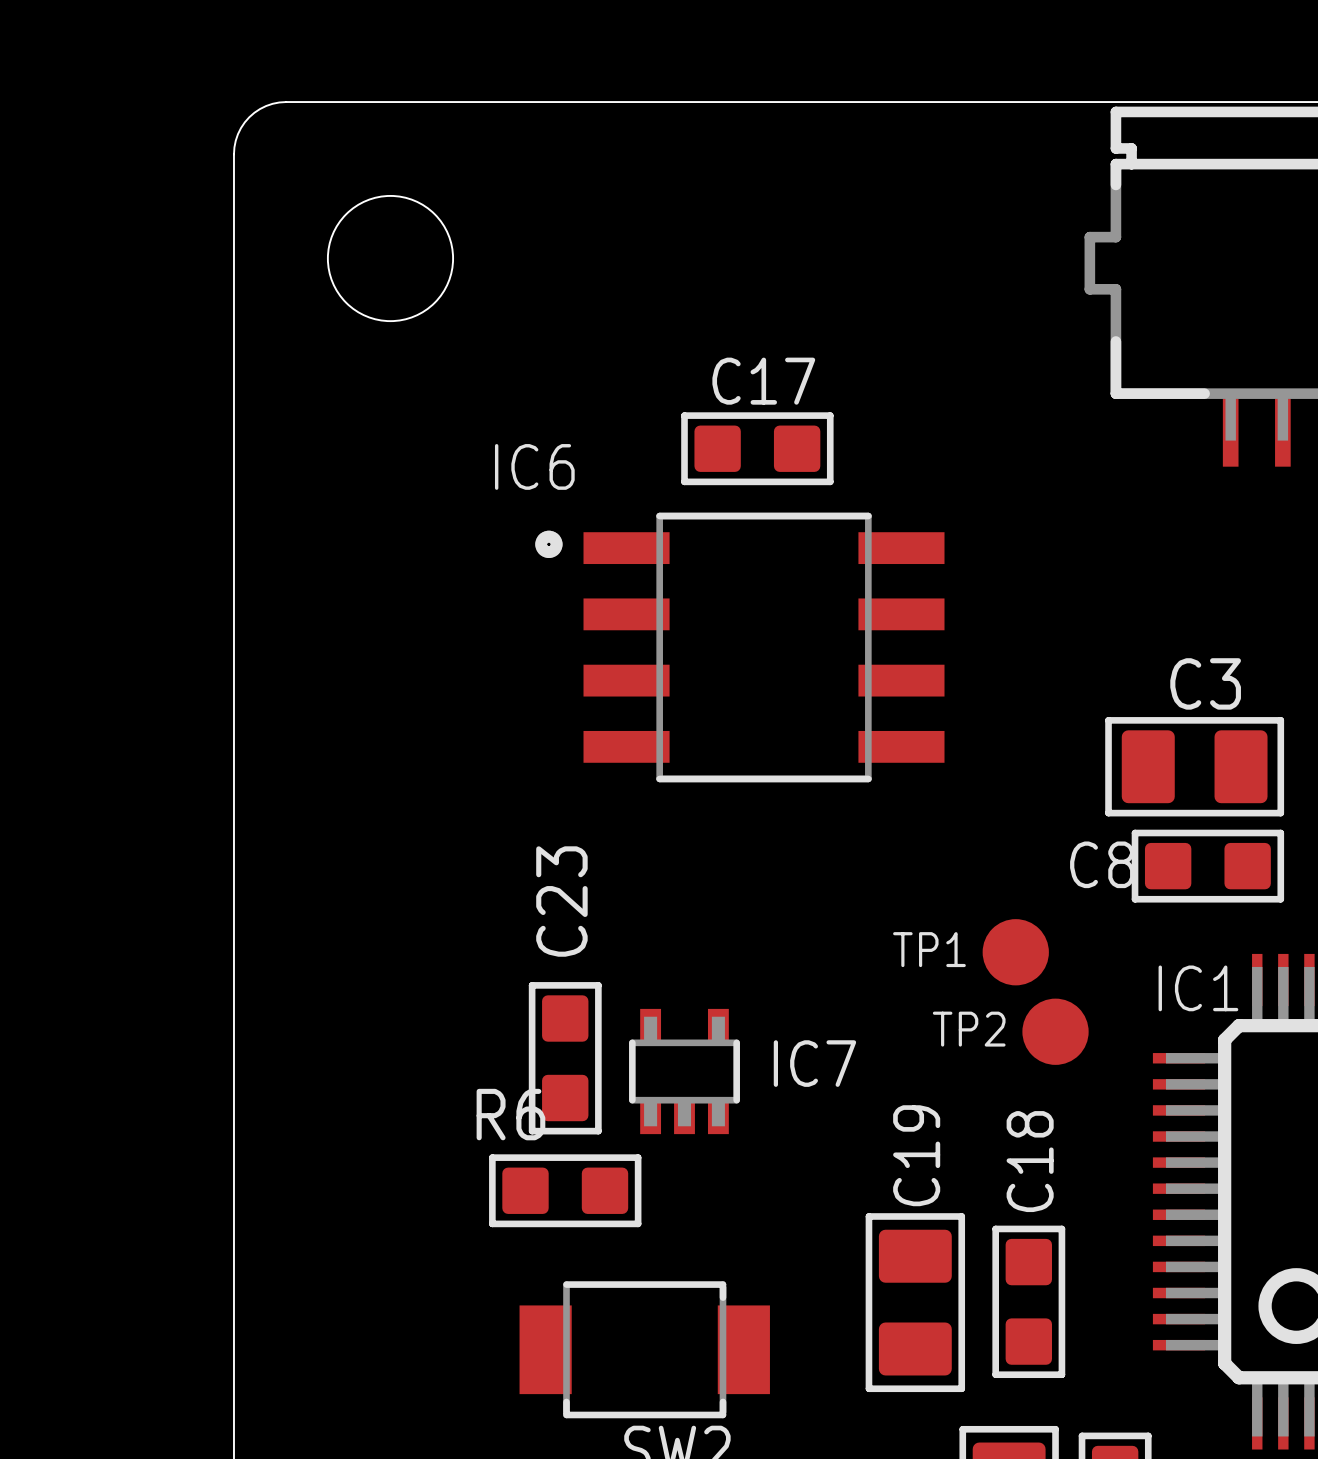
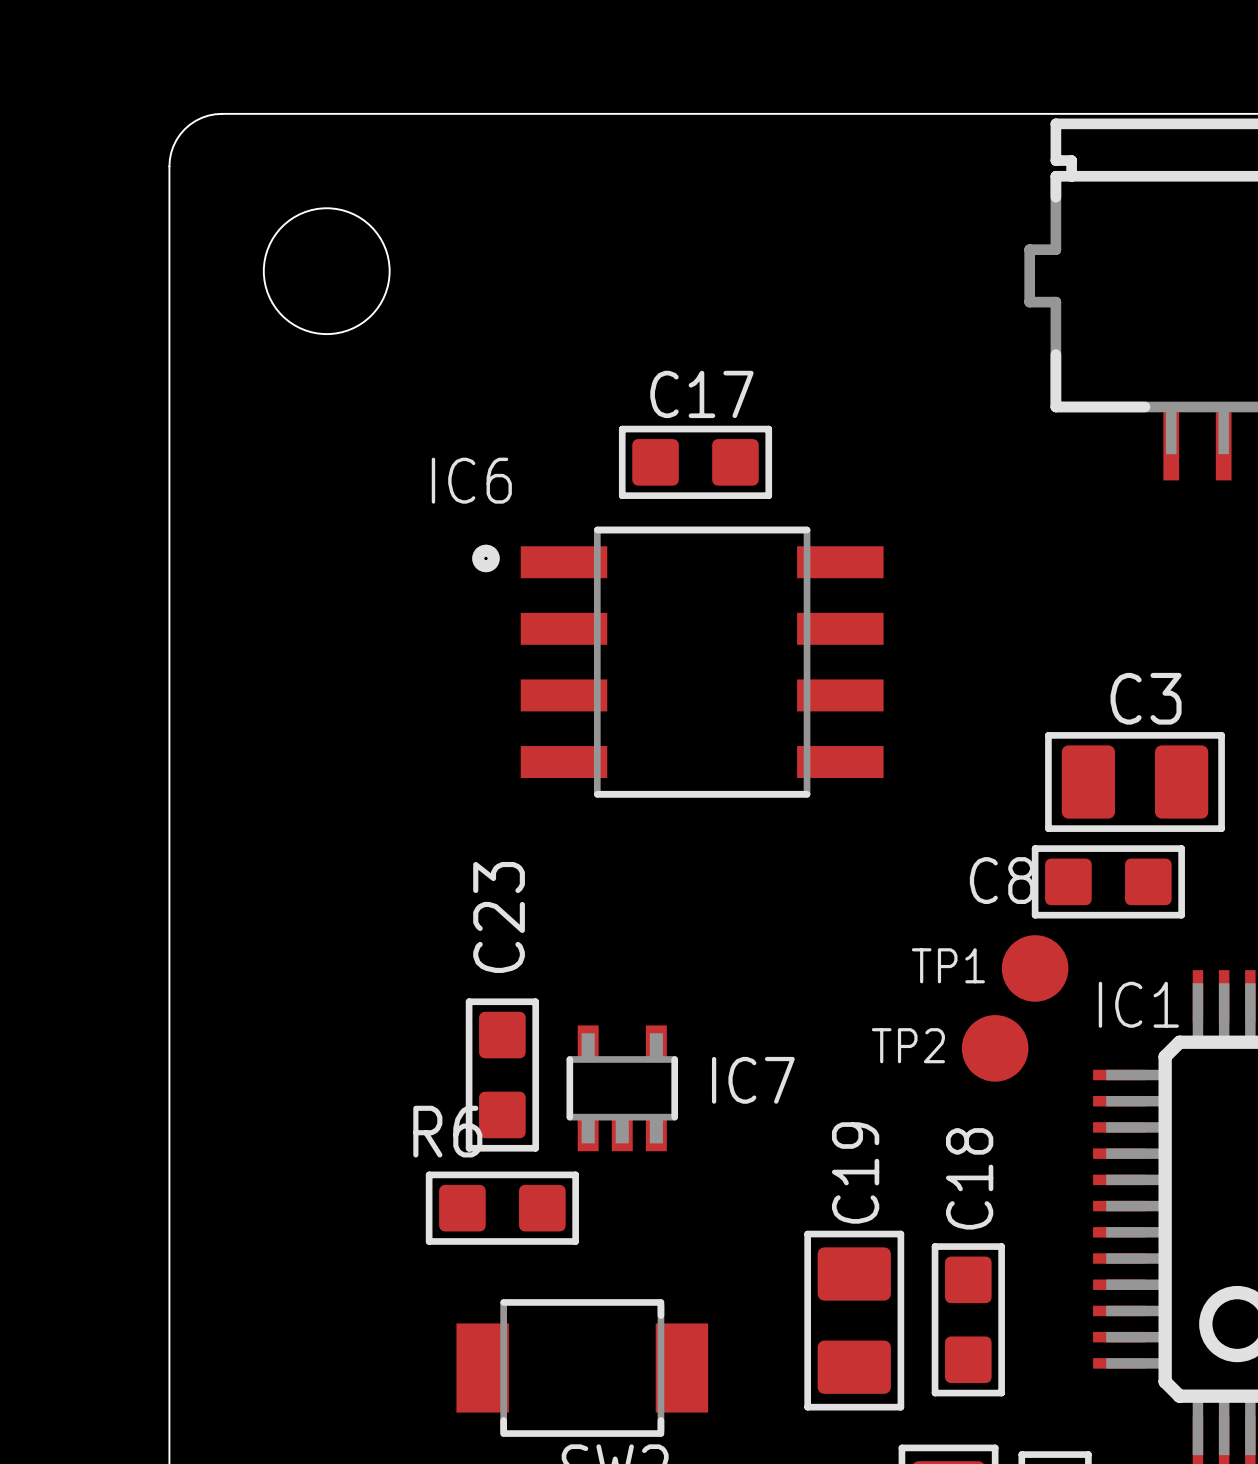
C8 position: (1207, 866) -> (1108, 881)
TP1 position: (1015, 952) -> (1035, 968)

